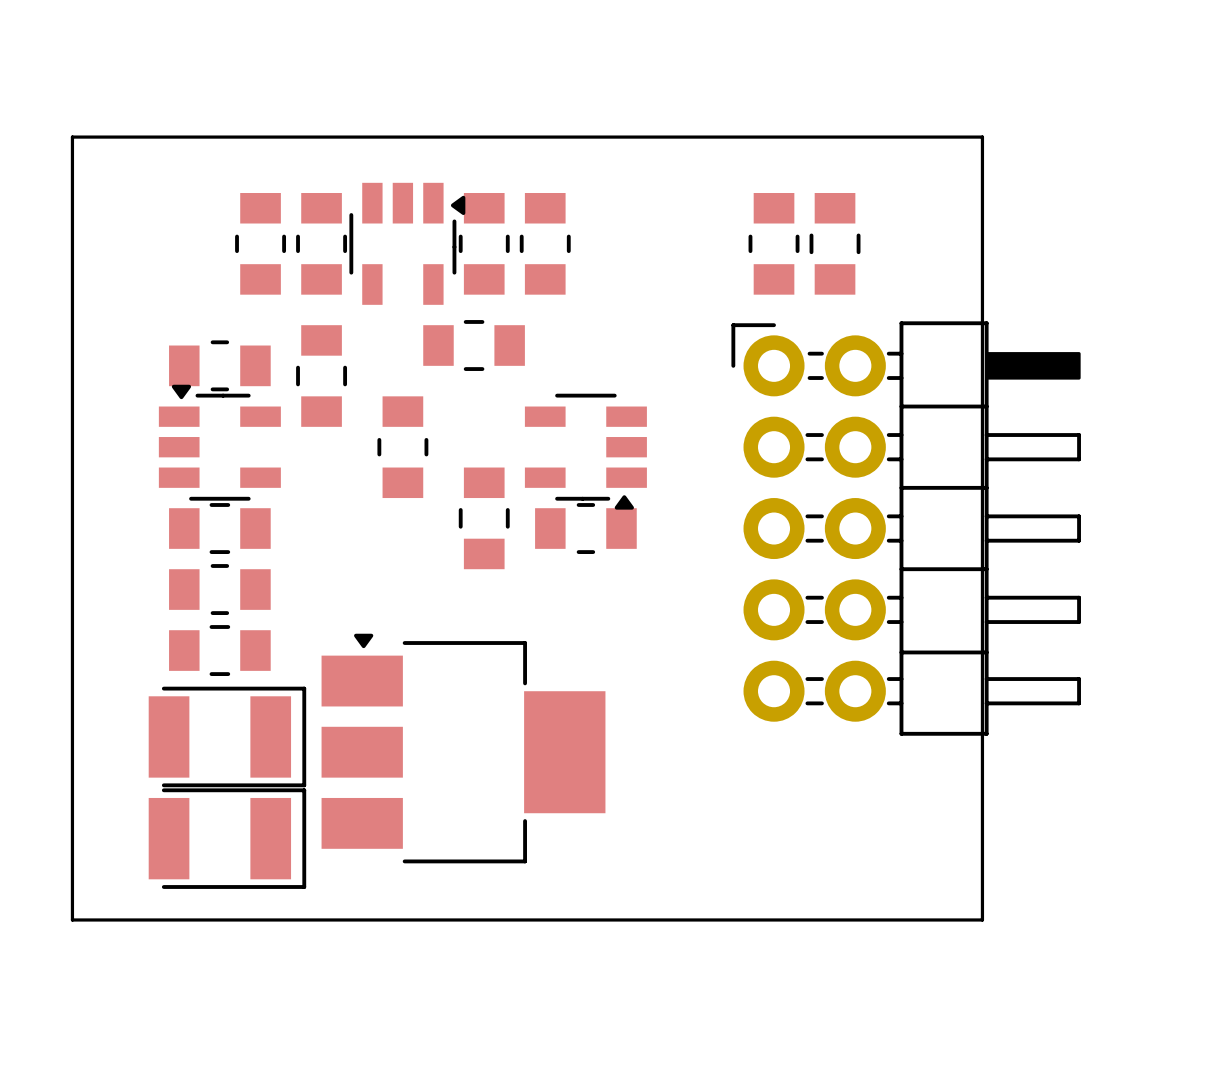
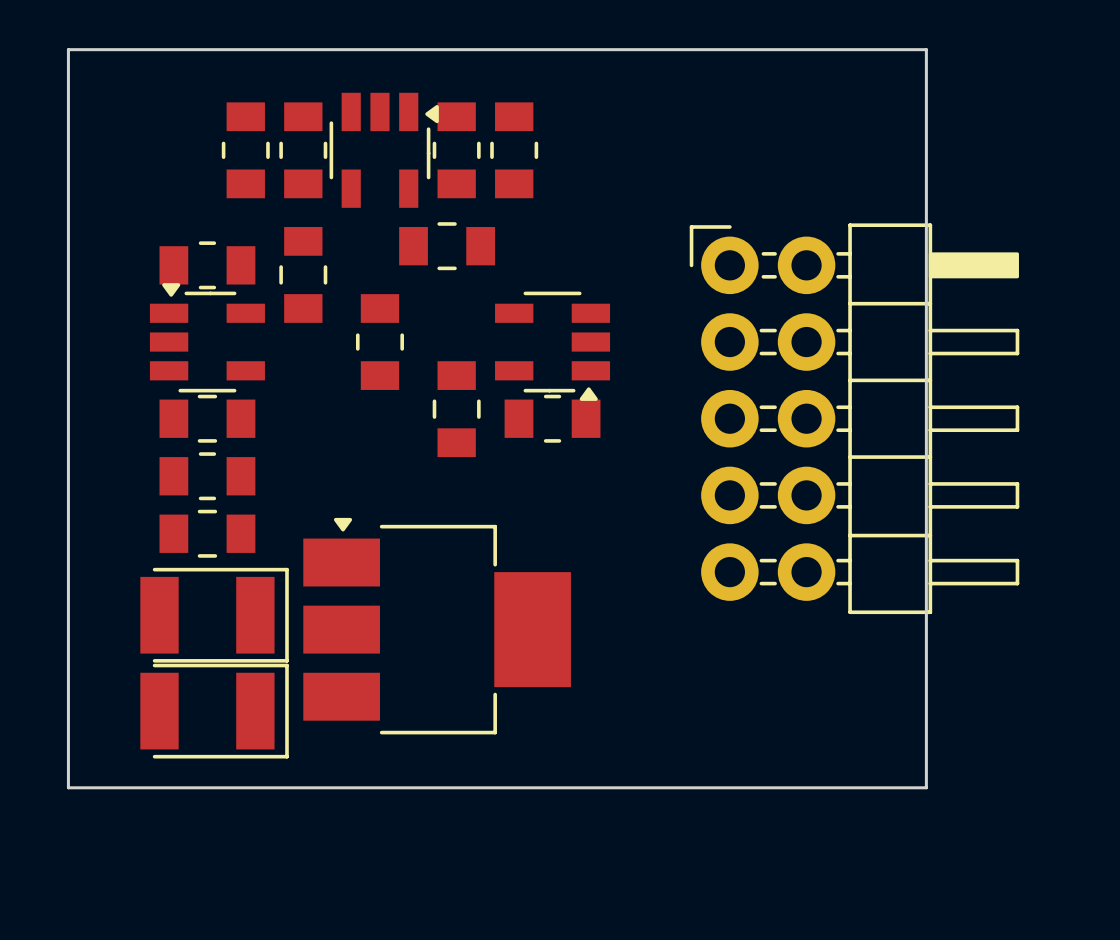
part: (774, 243) -> none
part: (835, 243) -> none

